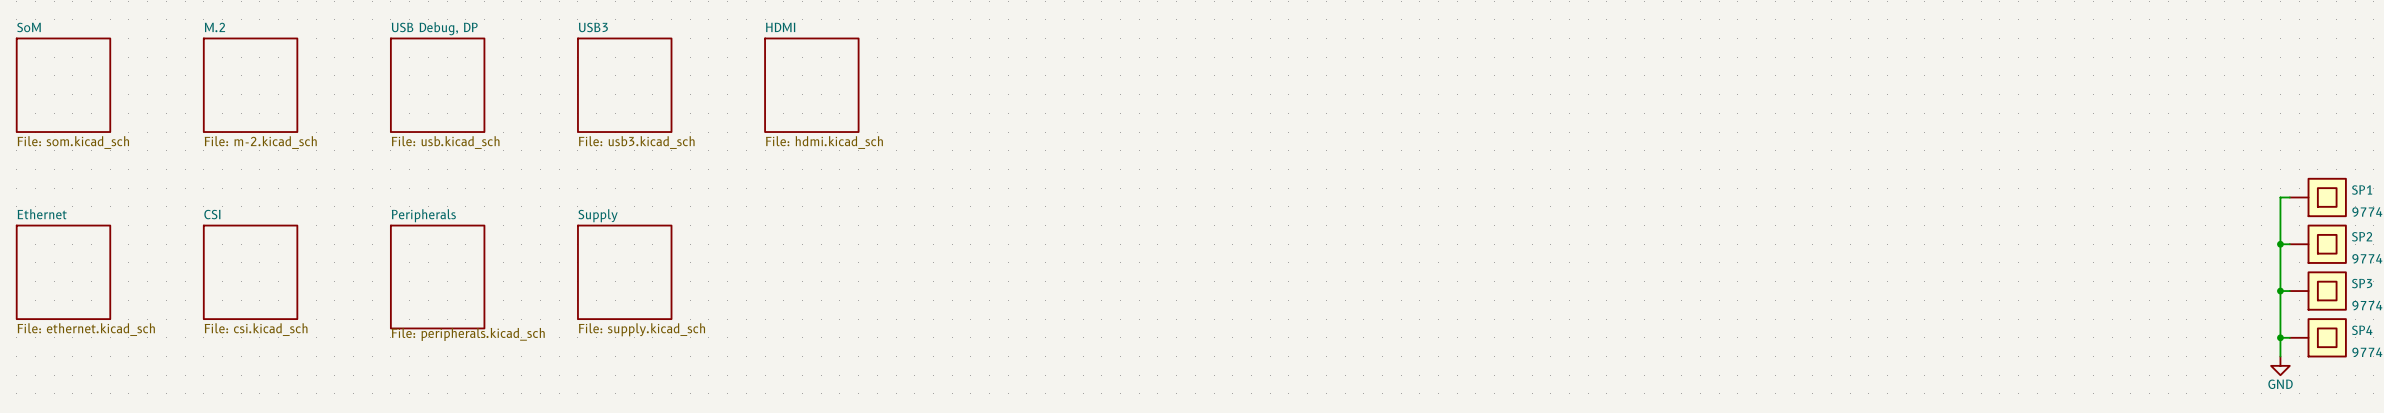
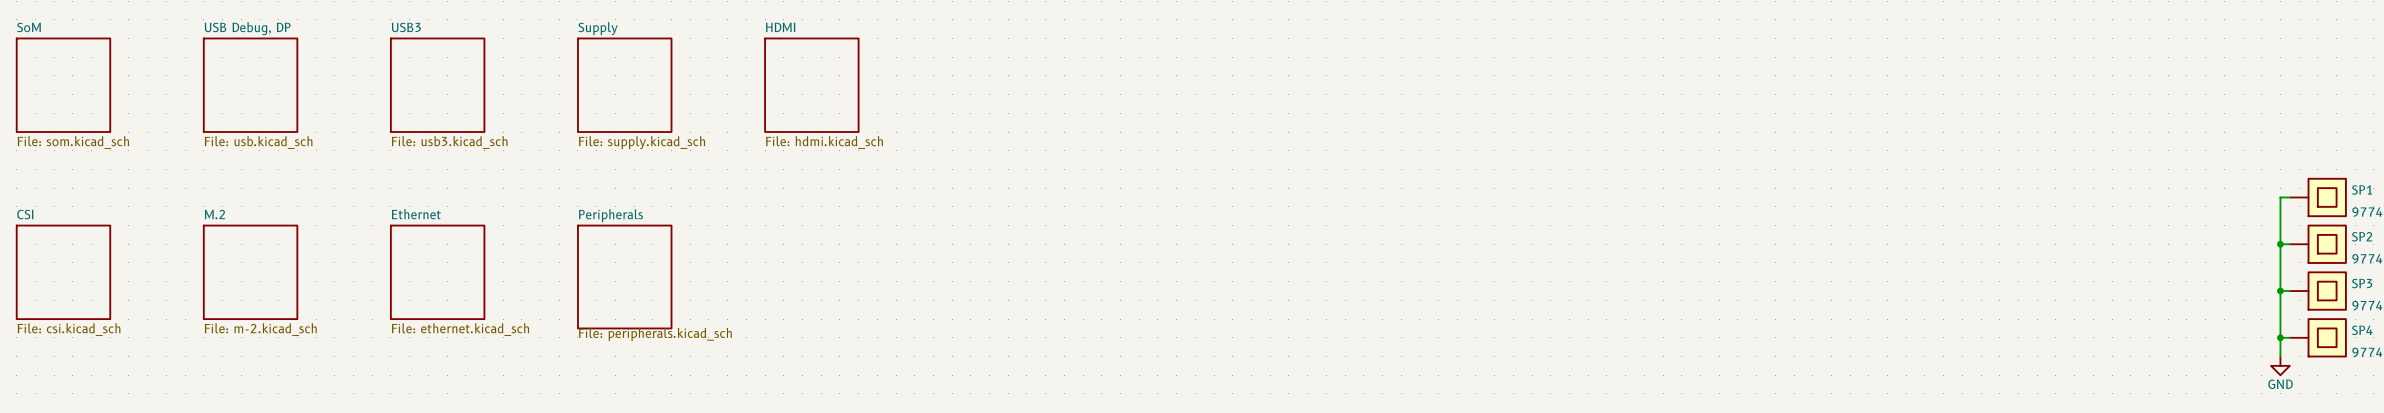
sheet M.2 name: M.2 (214, 27) -> USB Debug, DP (247, 28)
sheet USB3 name: USB3 (593, 27) -> Supply (598, 28)
sheet USB Debug, DP name: USB Debug, DP (434, 28) -> USB3 (406, 27)
sheet M.2 value: File: m-2.kicad_sch (260, 142) -> File: usb.kicad_sch (258, 142)
sheet USB Debug, DP value: File: usb.kicad_sch (445, 142) -> File: usb3.kicad_sch (449, 142)
sheet USB3 value: File: usb3.kicad_sch (636, 142) -> File: supply.kicad_sch (642, 142)
sheet Ethernet name: Ethernet (42, 214) -> CSI (25, 214)
sheet CSI name: CSI (212, 214) -> M.2 (214, 214)
sheet Ethernet: none -> File: ethernet.kicad_sch (437, 272)
sheet Supply: File: supply.kicad_sch (624, 272) -> none
sheet Peripherals: File: peripherals.kicad_sch (437, 277) -> none
sheet Peripherals: none -> File: peripherals.kicad_sch (624, 277)
sheet Ethernet value: File: ethernet.kicad_sch (86, 329) -> File: csi.kicad_sch (69, 329)
sheet CSI value: File: csi.kicad_sch (256, 329) -> File: m-2.kicad_sch (260, 329)

